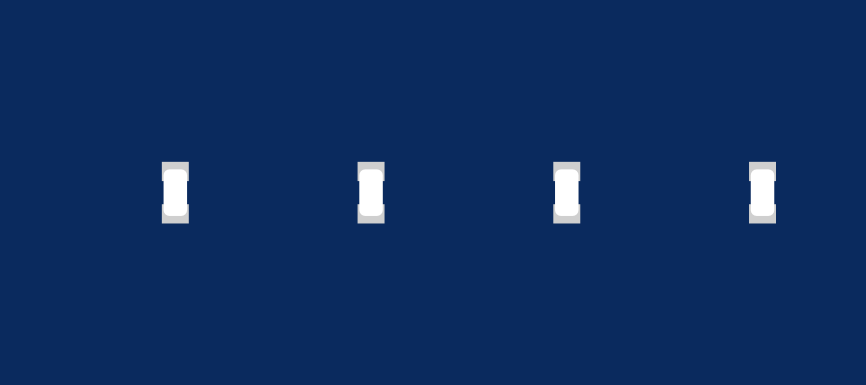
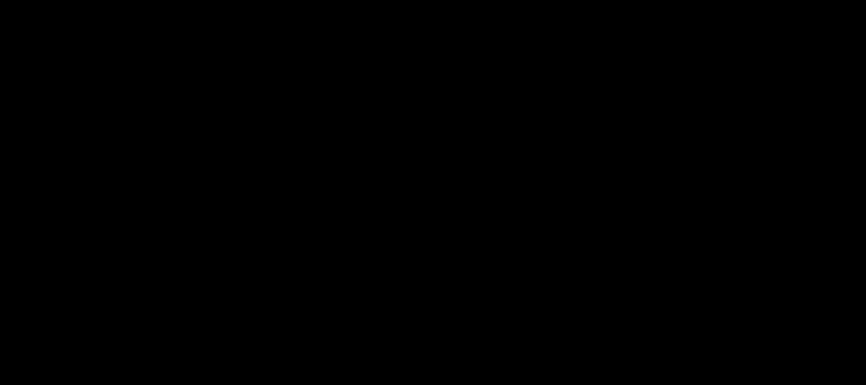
part: (175, 192) -> none
part: (371, 192) -> none
part: (566, 192) -> none
part: (762, 192) -> none

